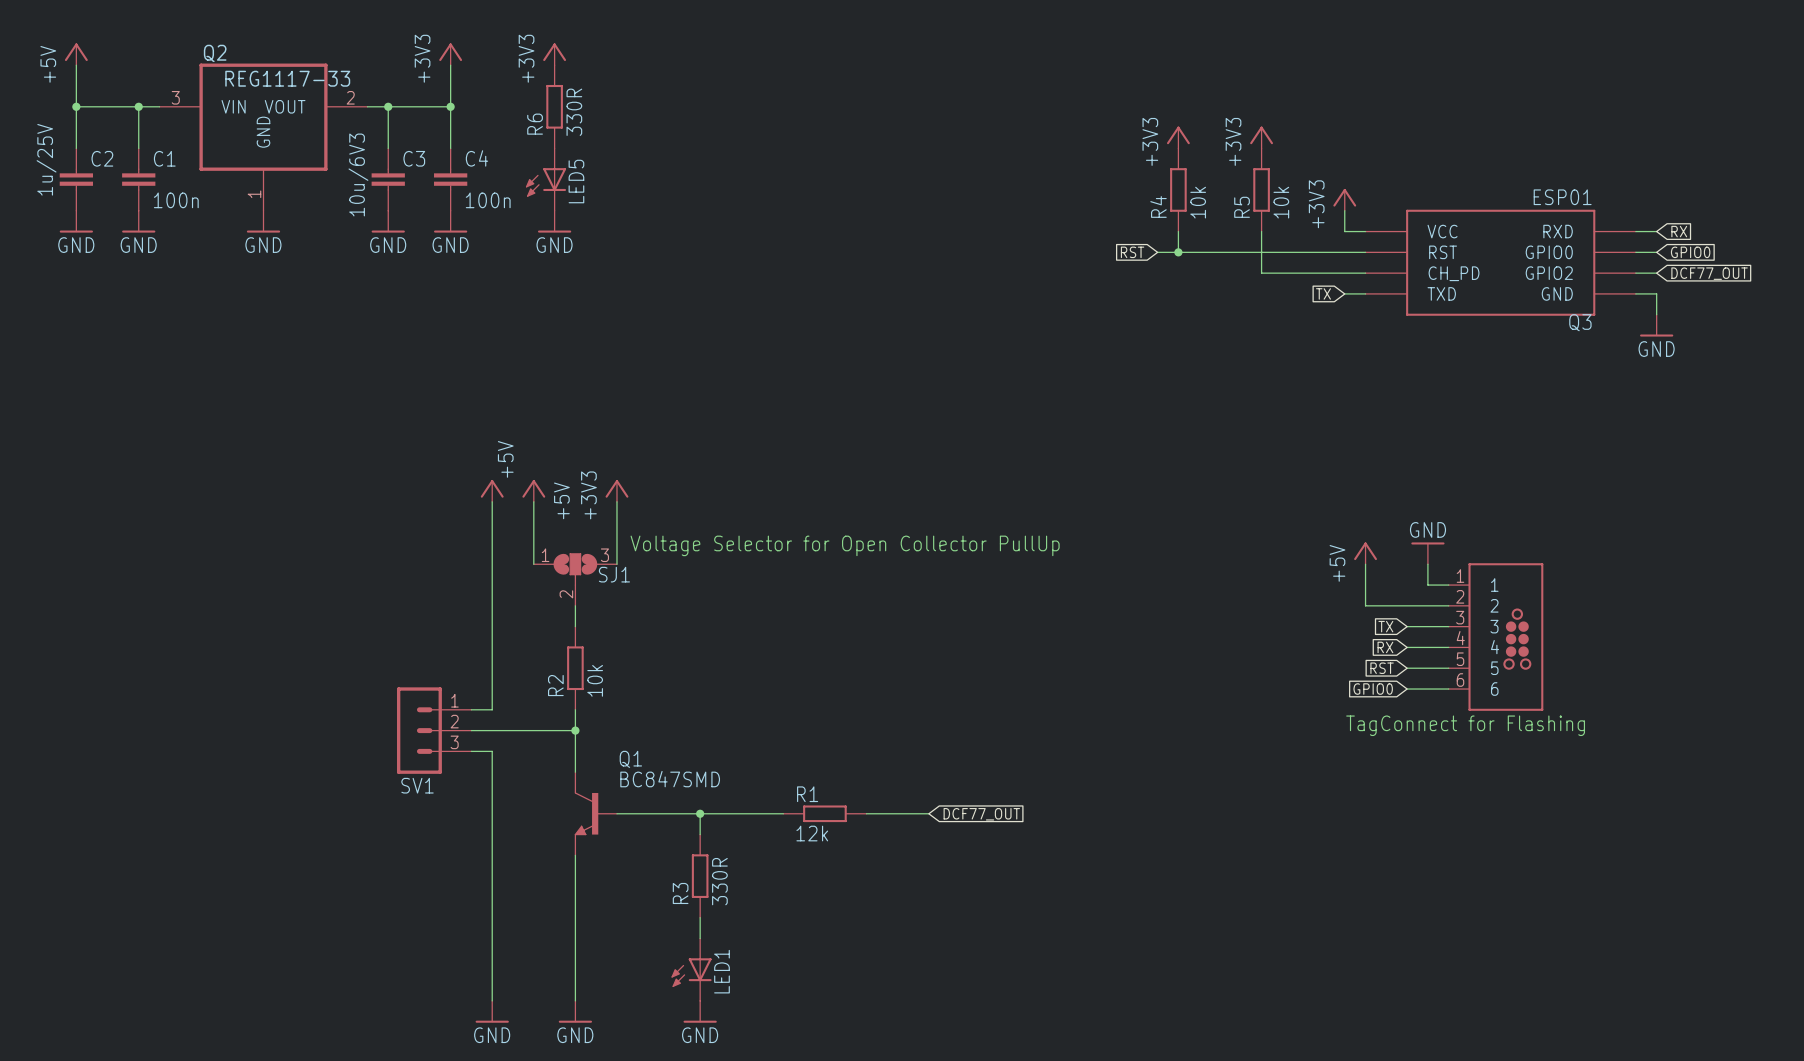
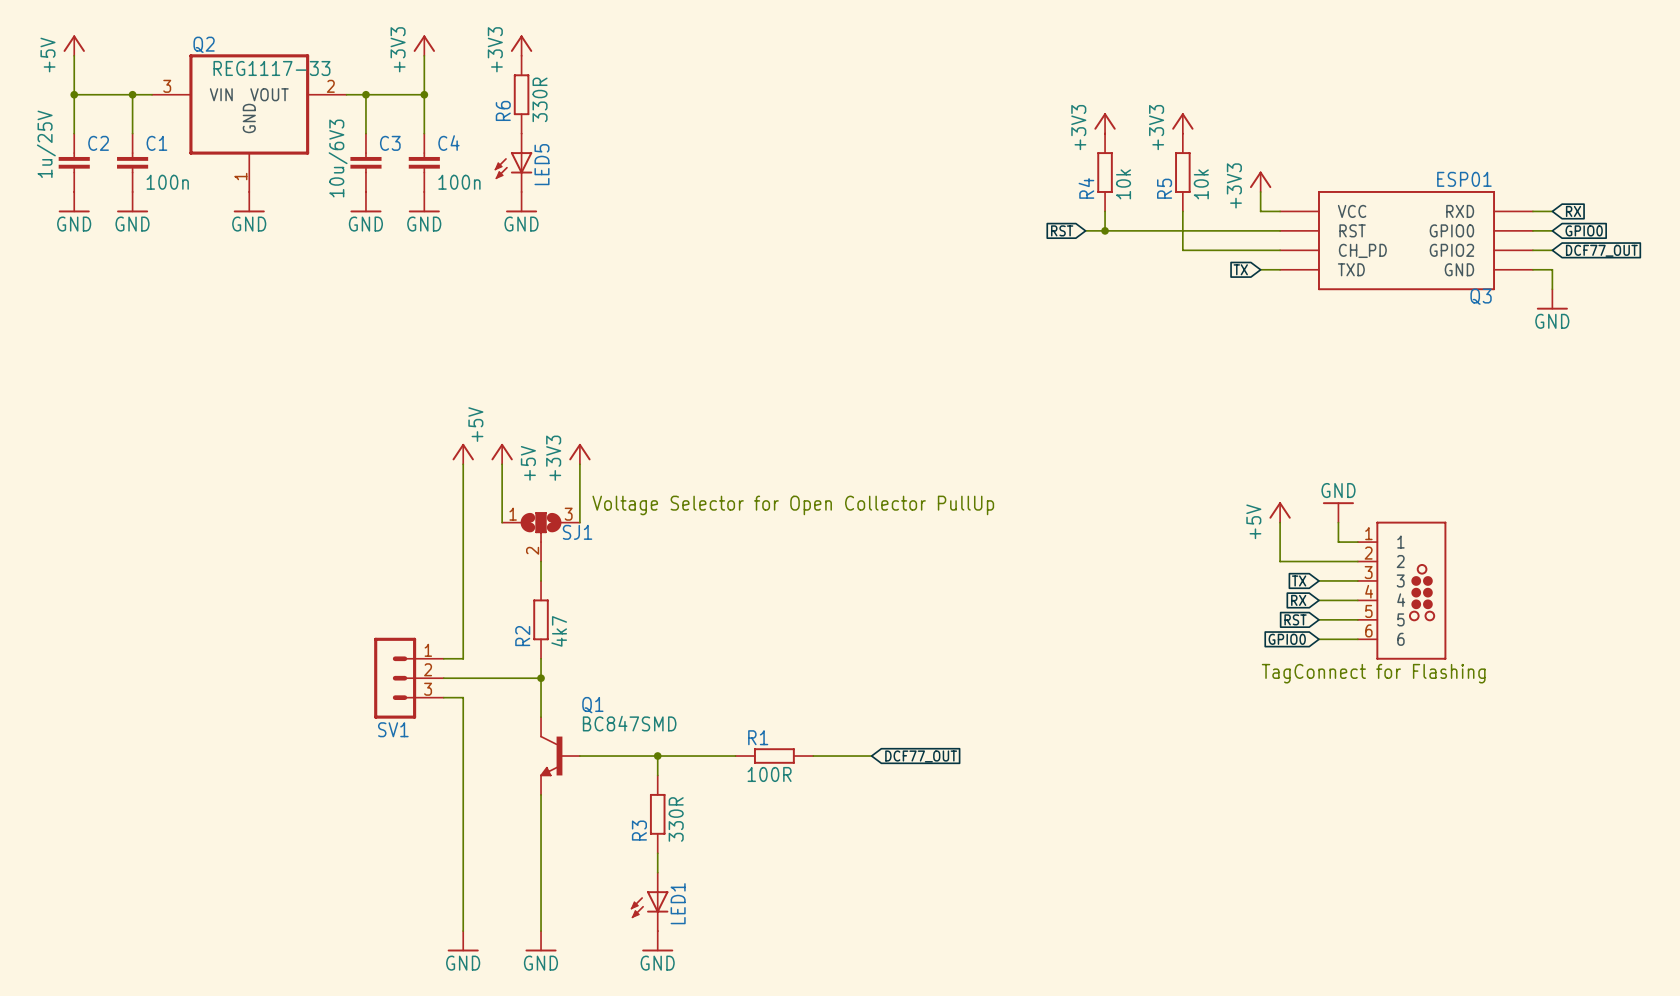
R2 value: 10k (595, 680) -> 4k7 (559, 631)
R1 value: 12k (812, 833) -> 100R (769, 774)

